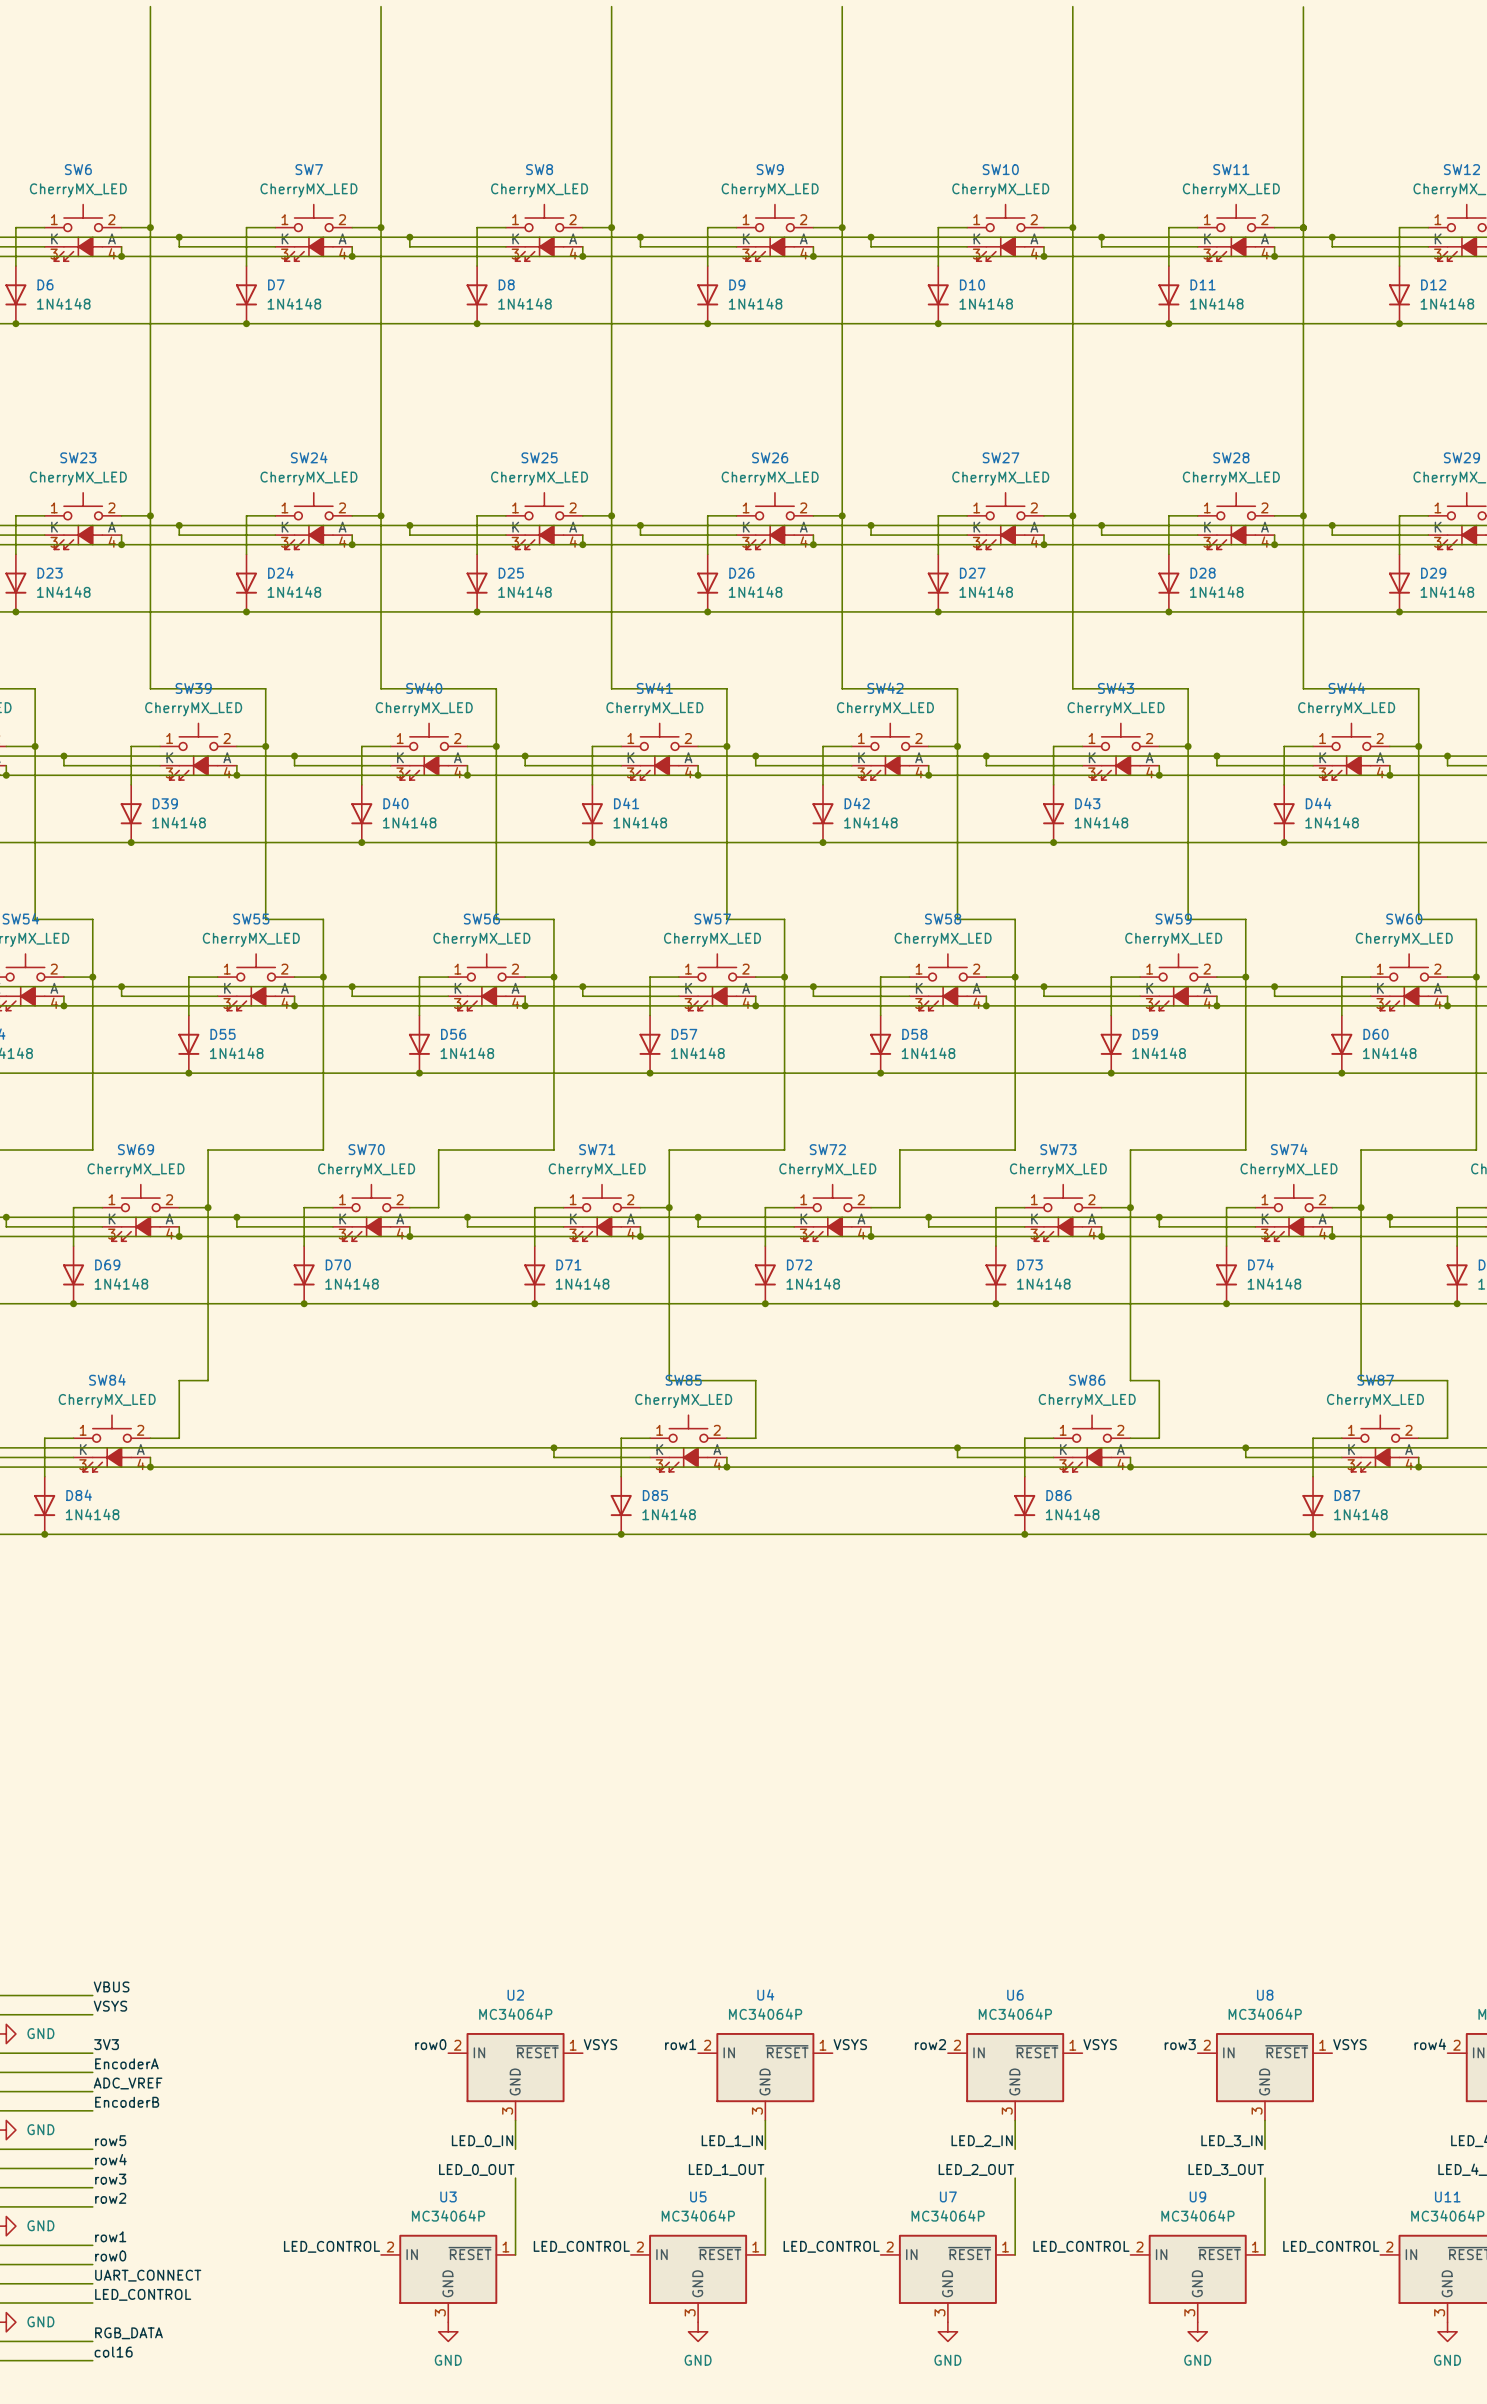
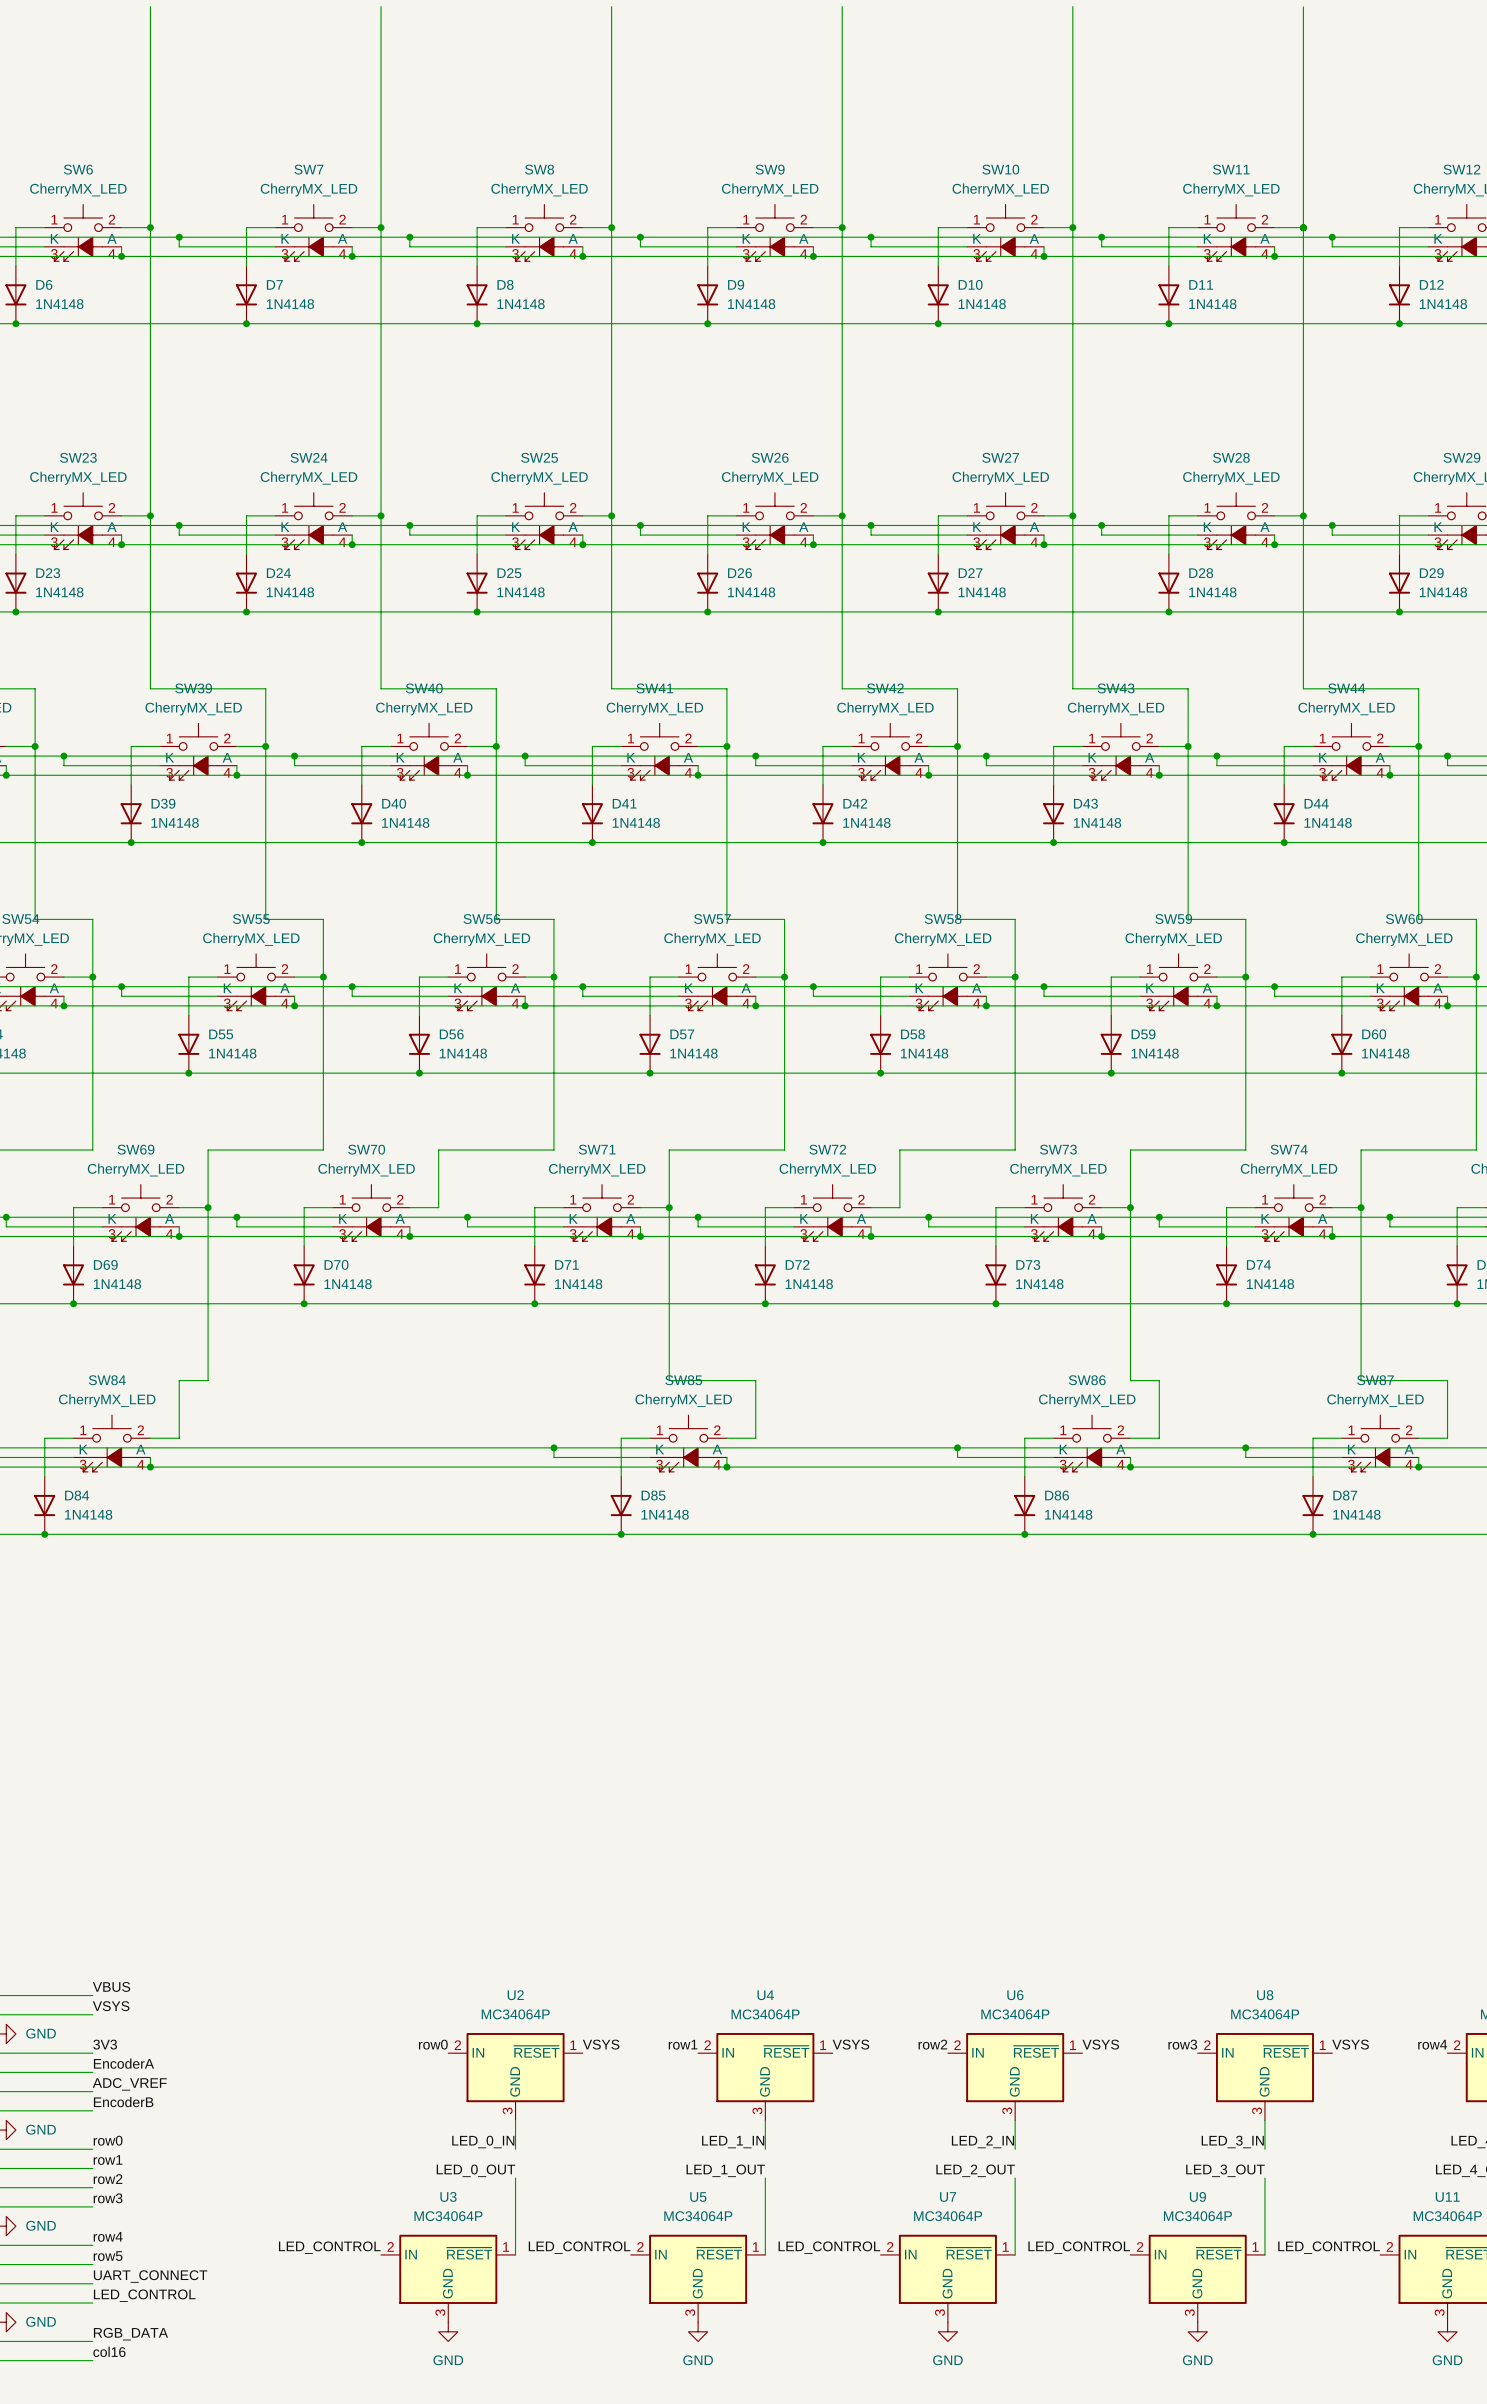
label: row5 (110, 2140) -> row0 (108, 2140)
label: row4 (110, 2159) -> row1 (108, 2159)
label: row3 (110, 2179) -> row2 (108, 2179)
label: row2 (110, 2198) -> row3 (108, 2198)
label: row1 (110, 2236) -> row4 (108, 2236)
label: row0 (110, 2255) -> row5 (108, 2256)

